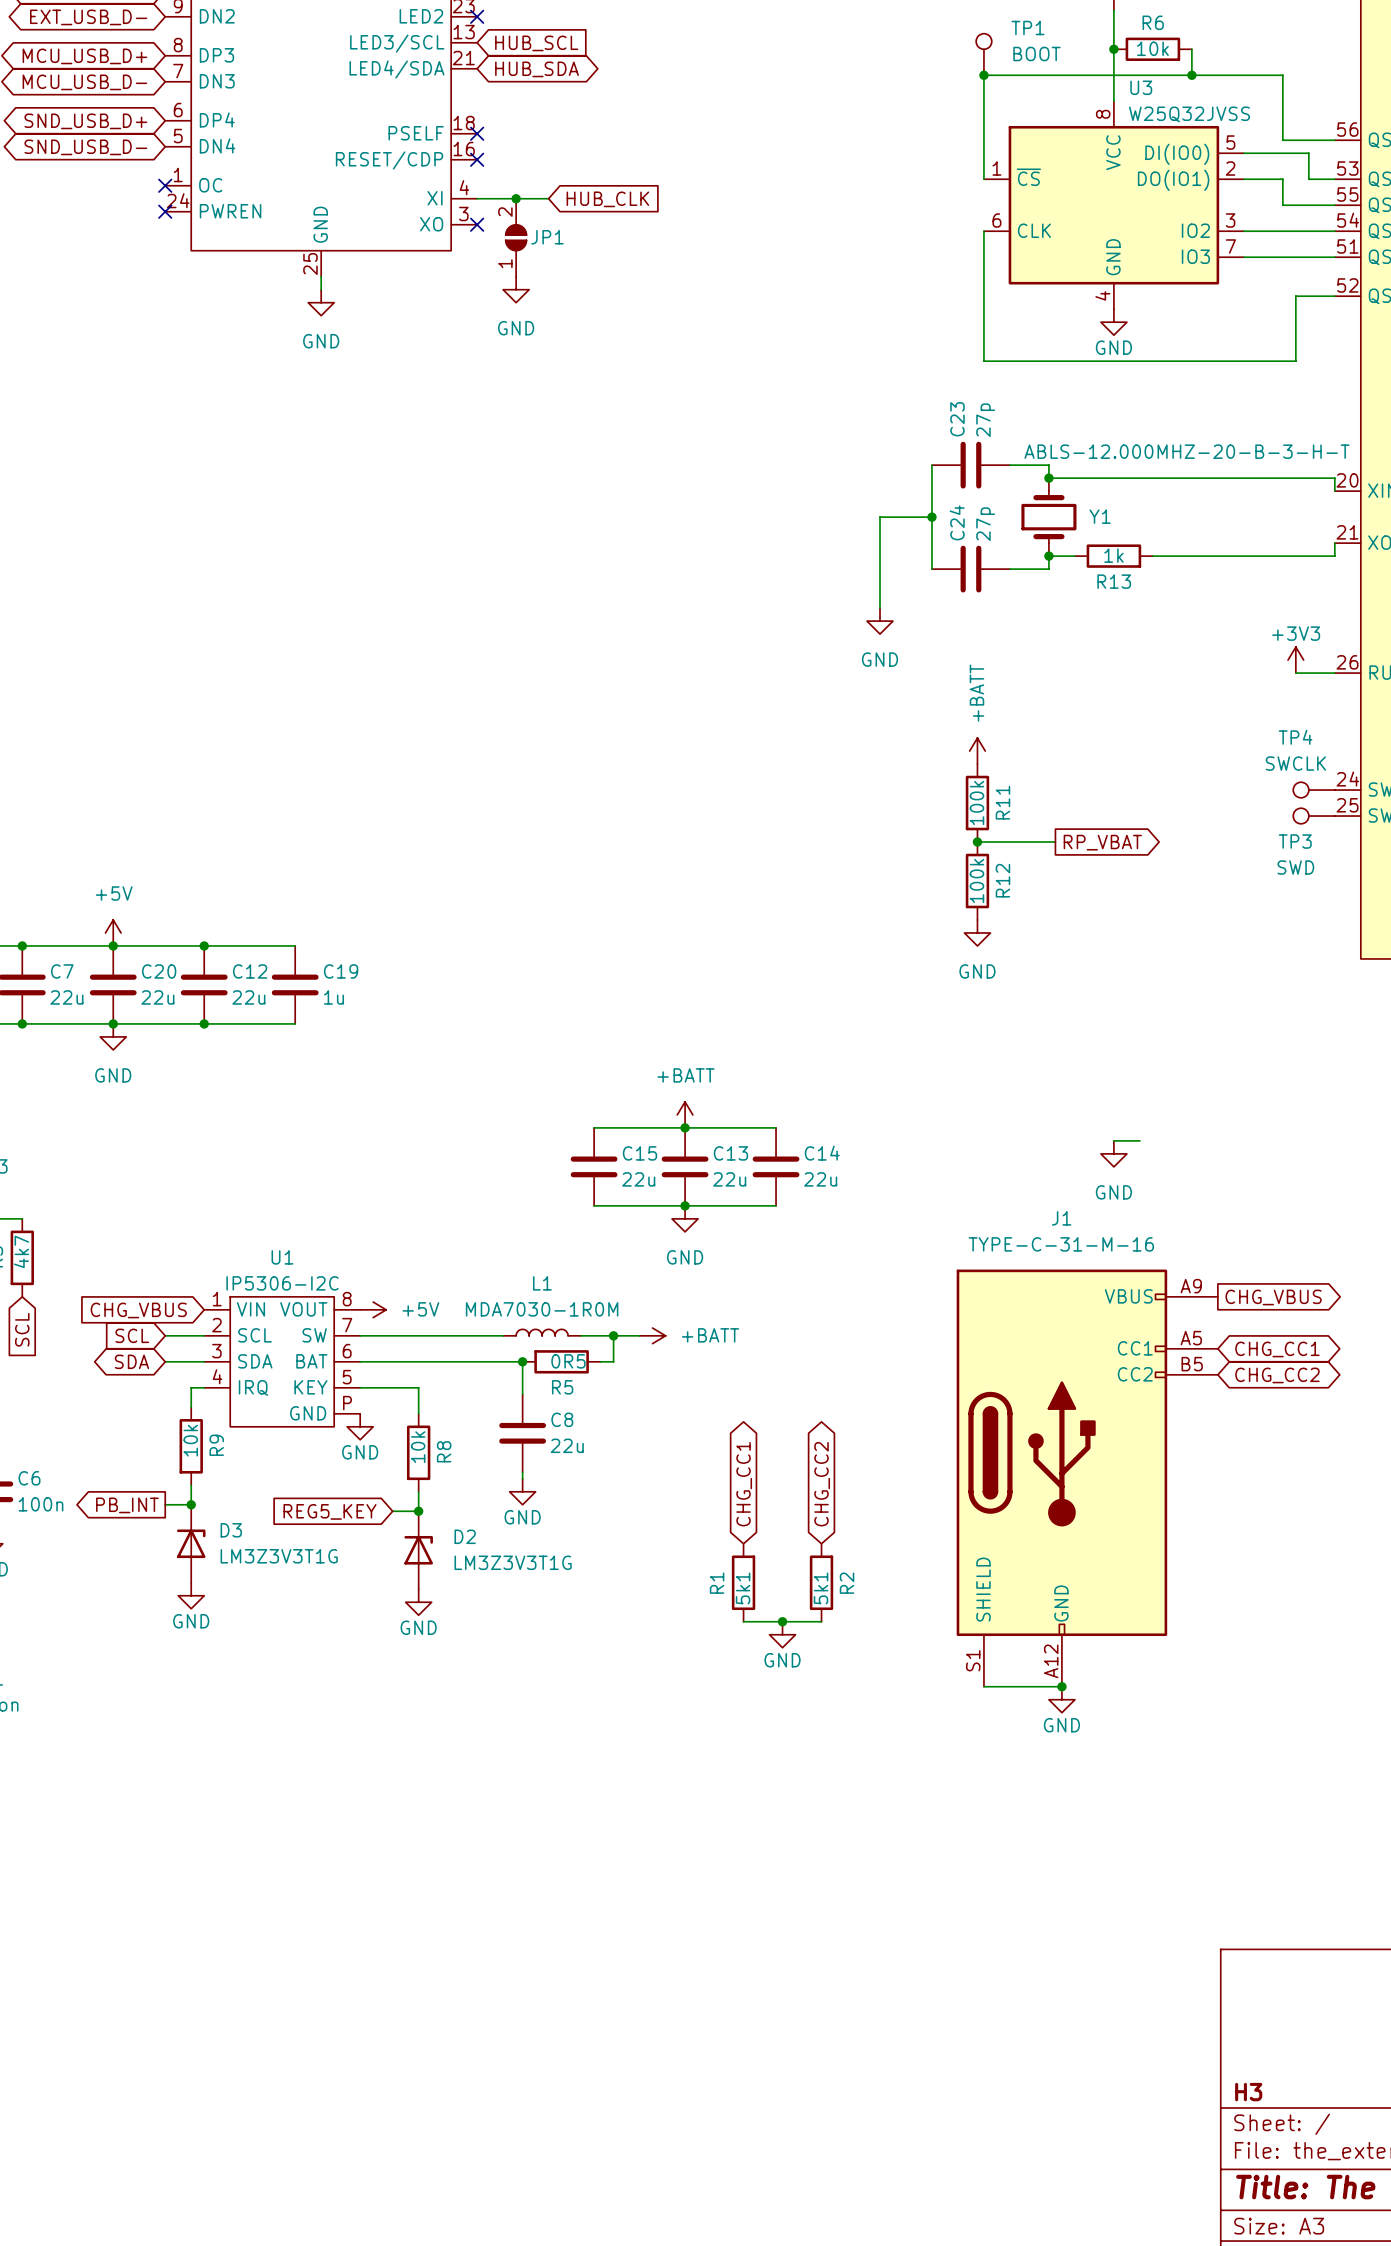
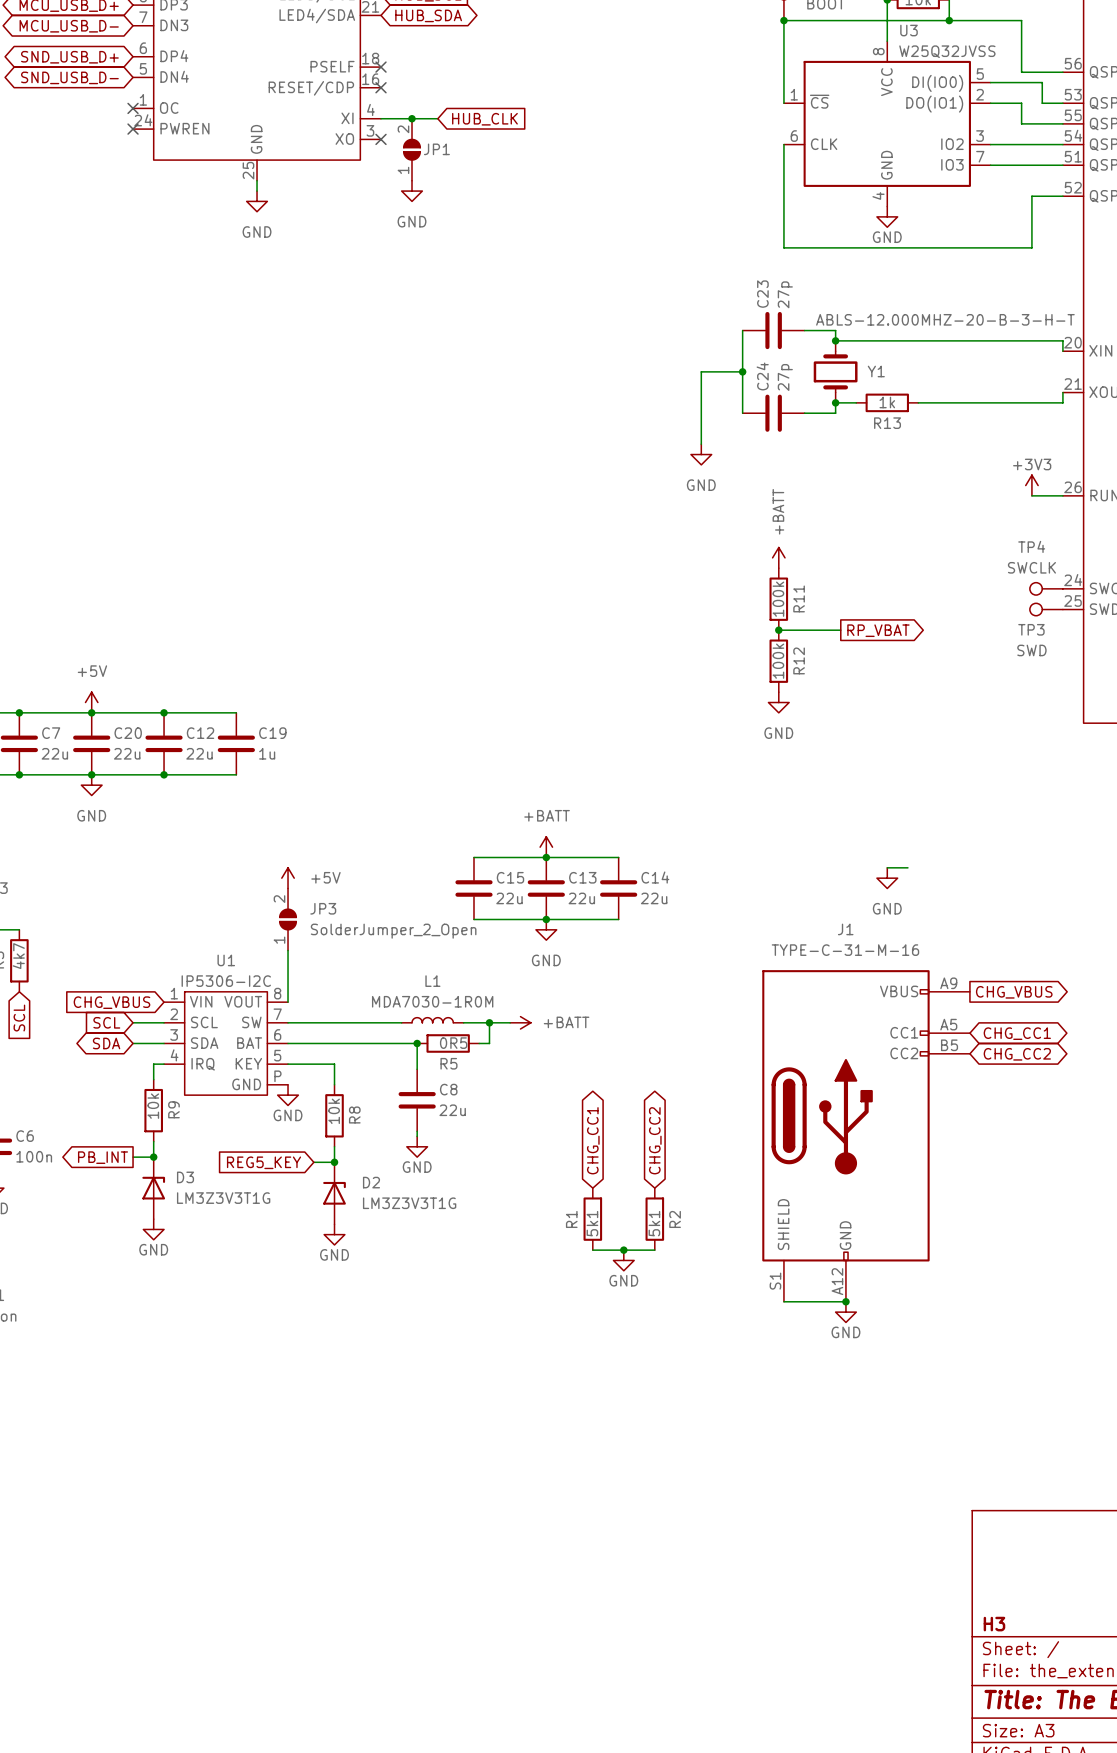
JP3: none -> SolderJumper_2_Open (288, 919)
wire: none -> (288, 950) (288, 1002)
power symbol rotation: 0° (373, 1309) -> 90° counterclockwise (288, 878)
power symbol position: +5V (373, 1309) -> +5V (288, 878)

